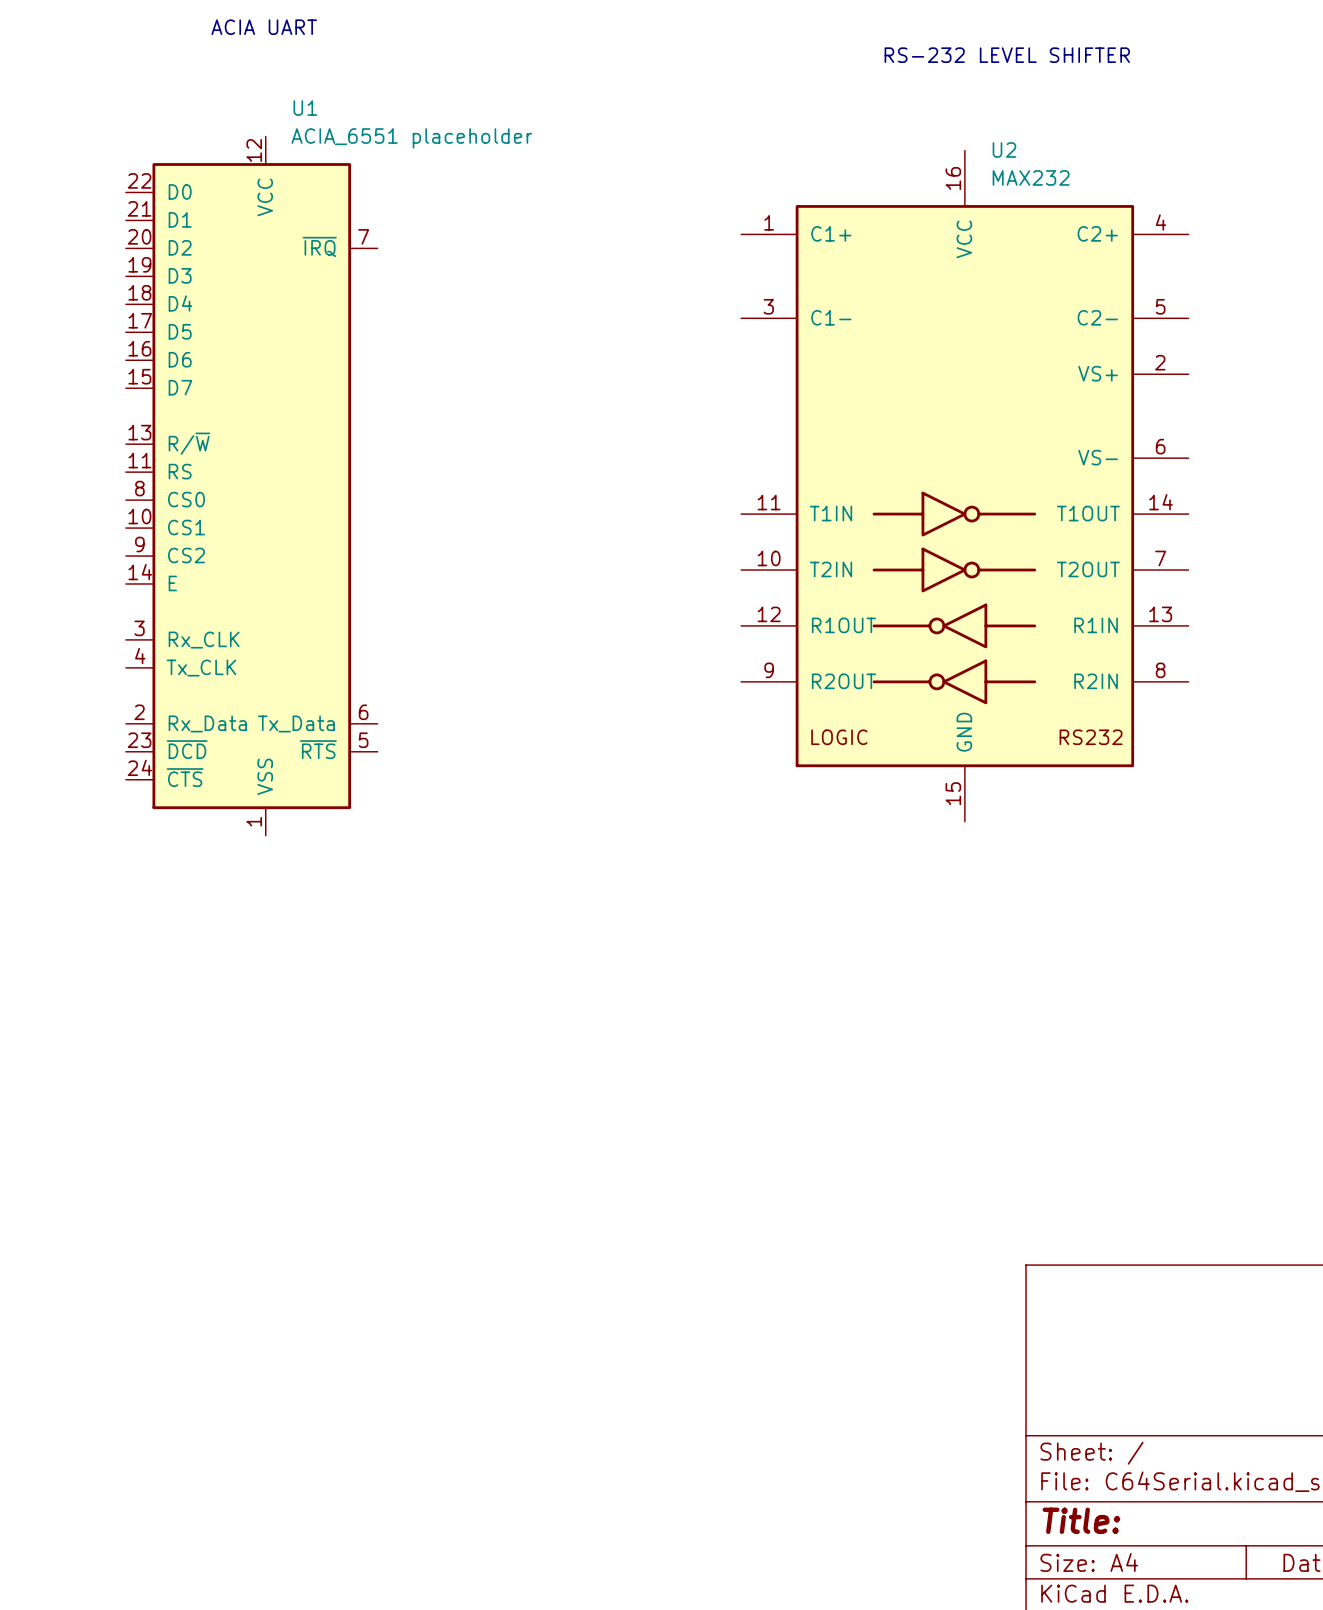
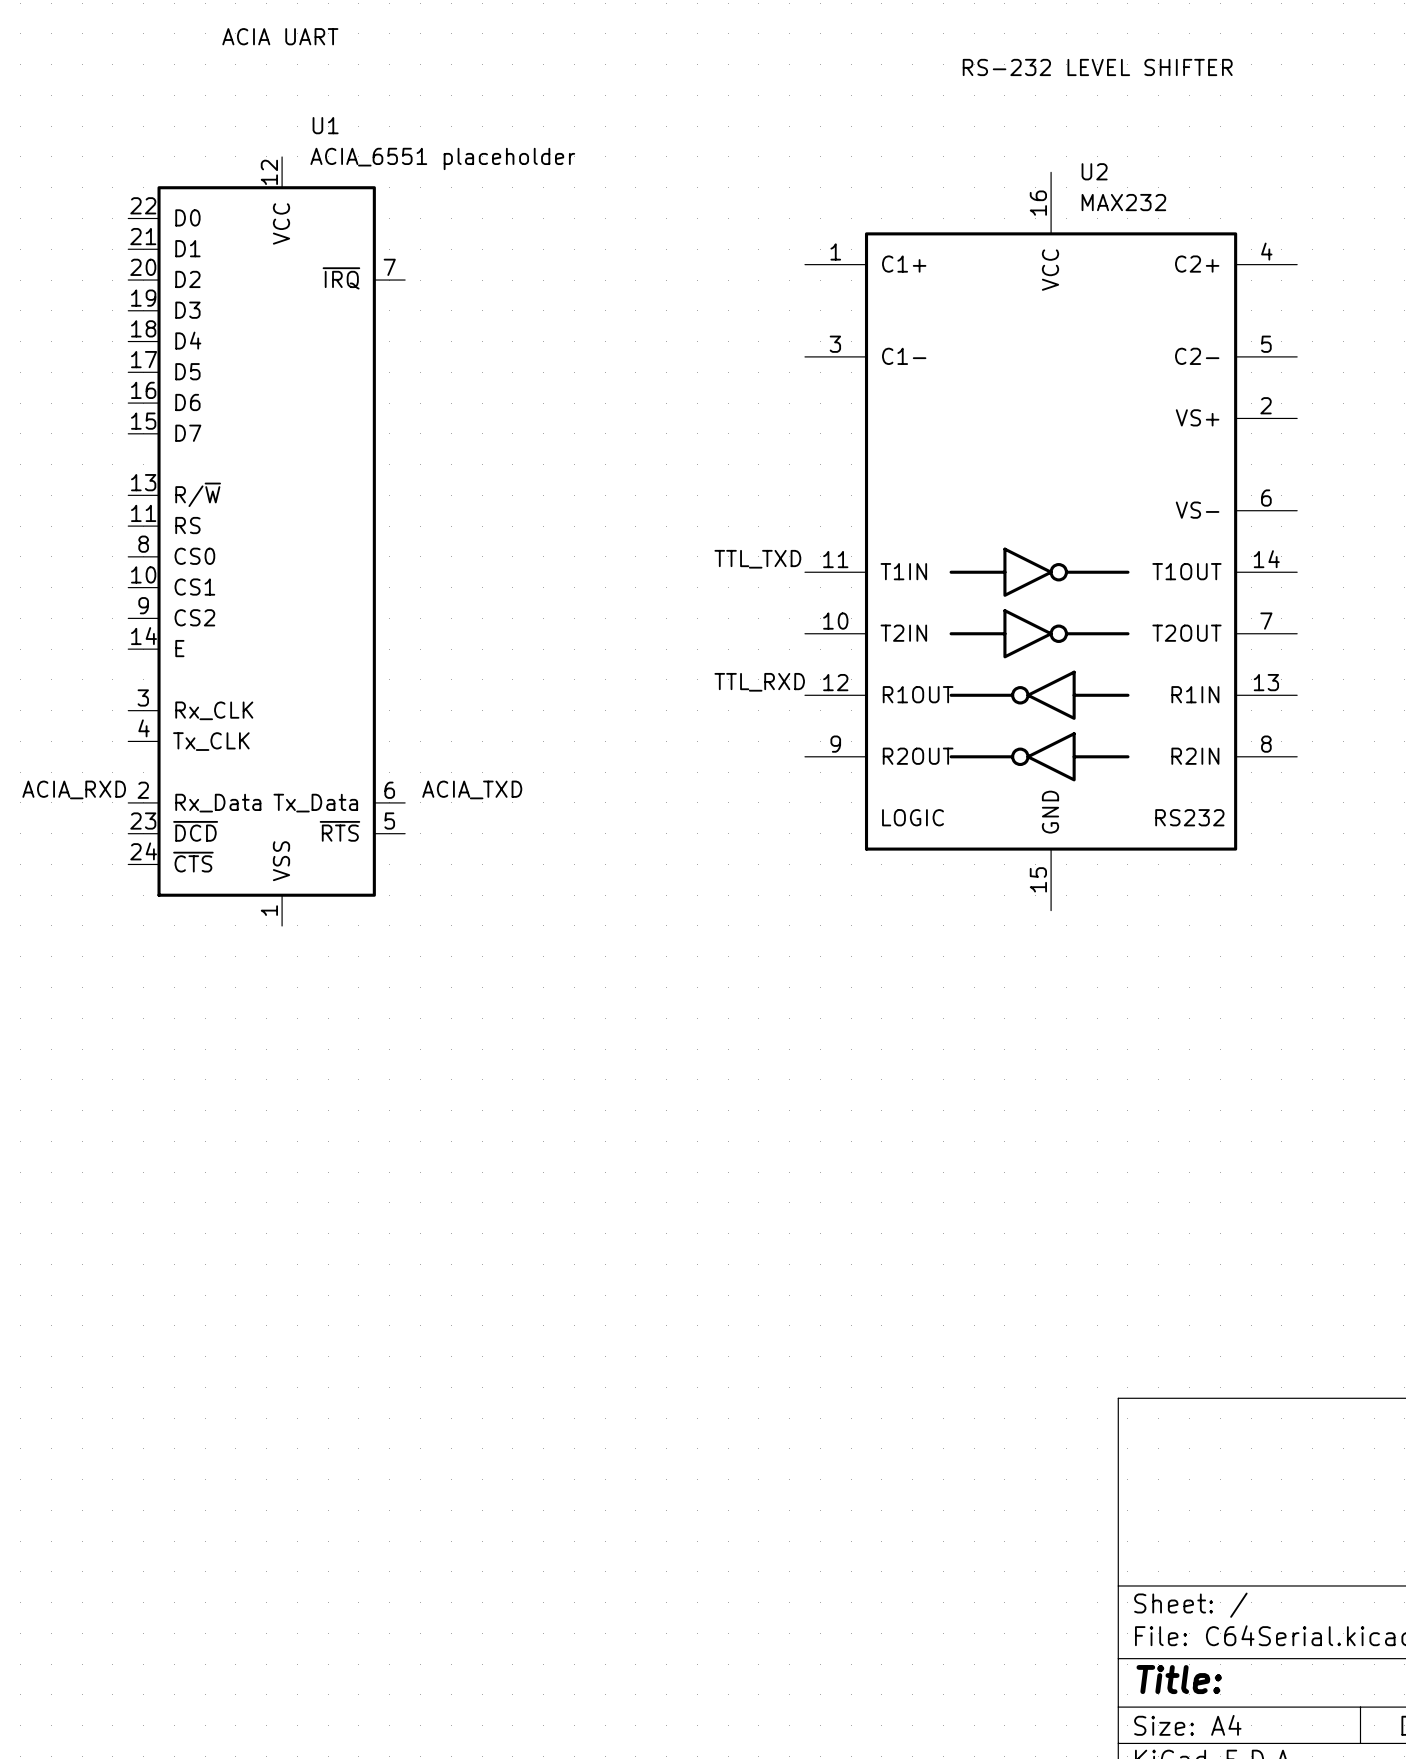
label: none -> TTL_TXD (757, 559)
label: none -> TTL_RXD (759, 682)
label: none -> ACIA_RXD (74, 789)
label: none -> ACIA_TXD (472, 789)

